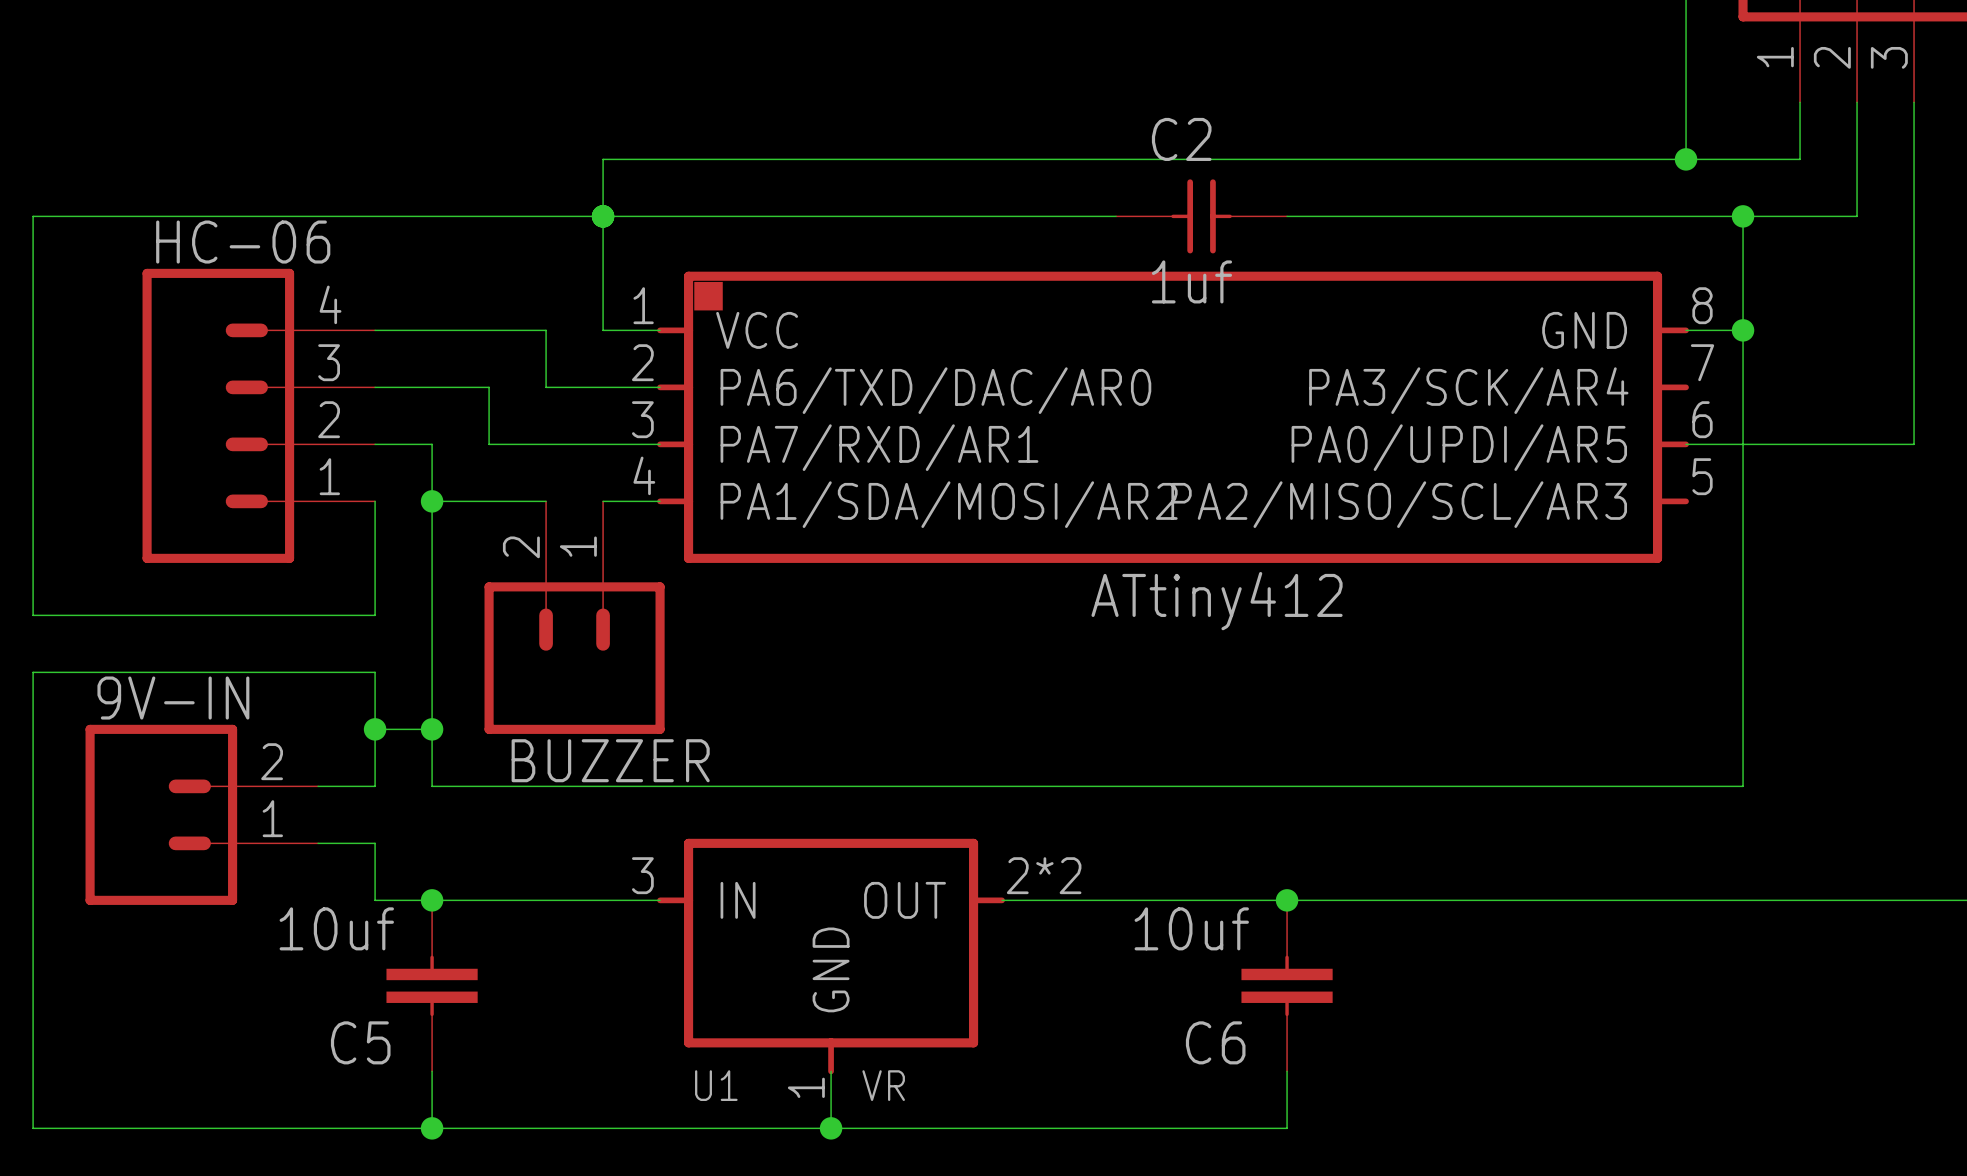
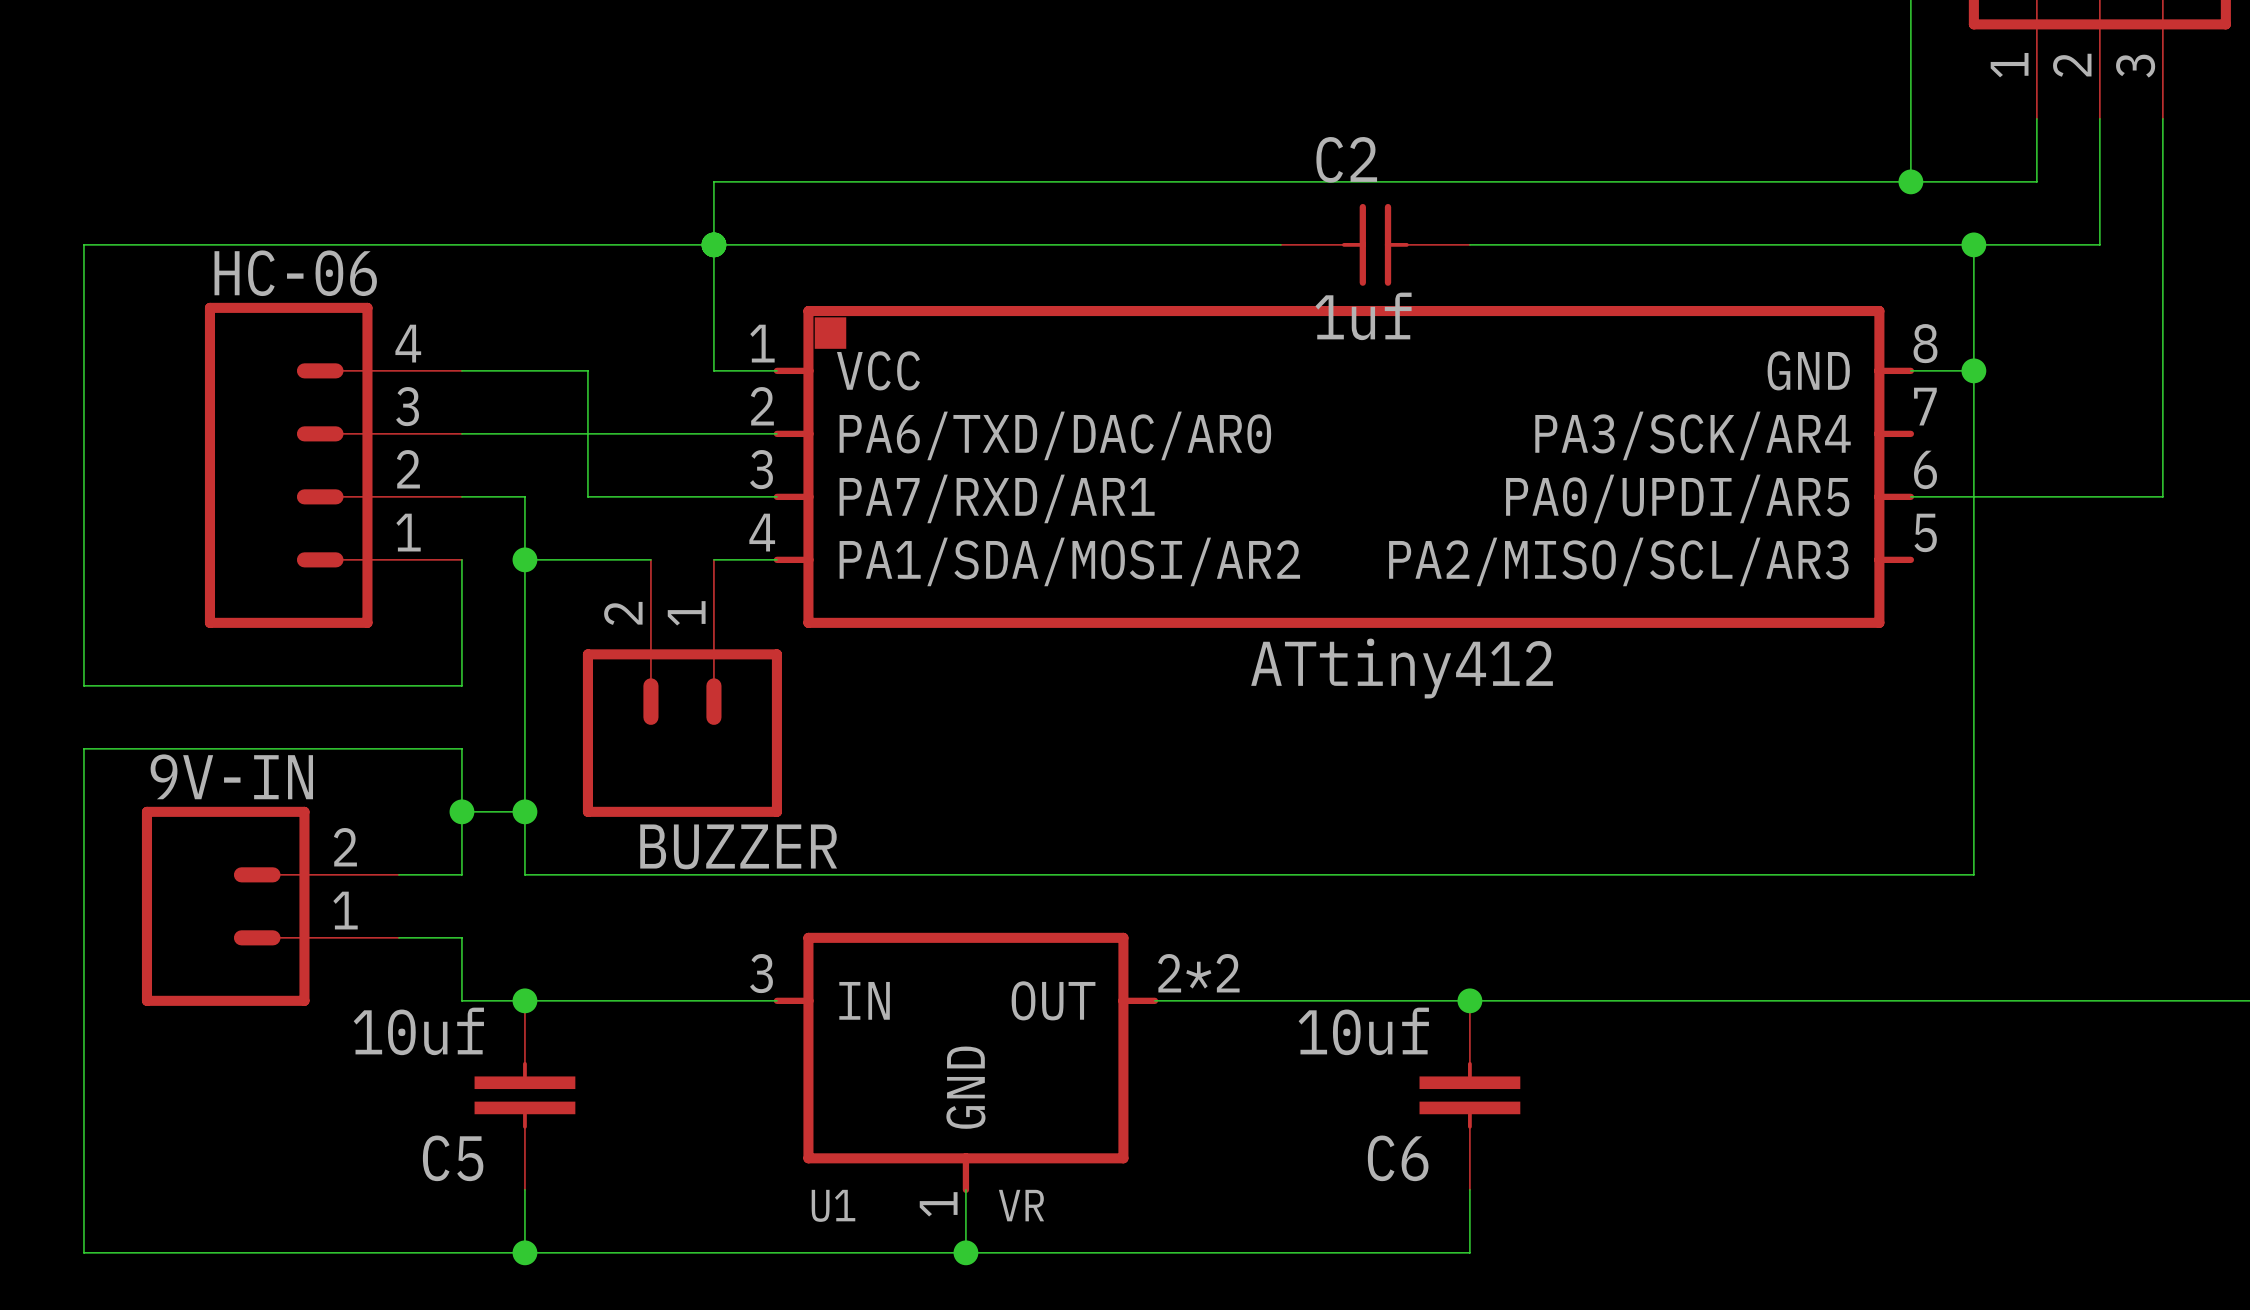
wire: (489, 330) (546, 330) (546, 387) -> (587, 370) (587, 433) (650, 433)

